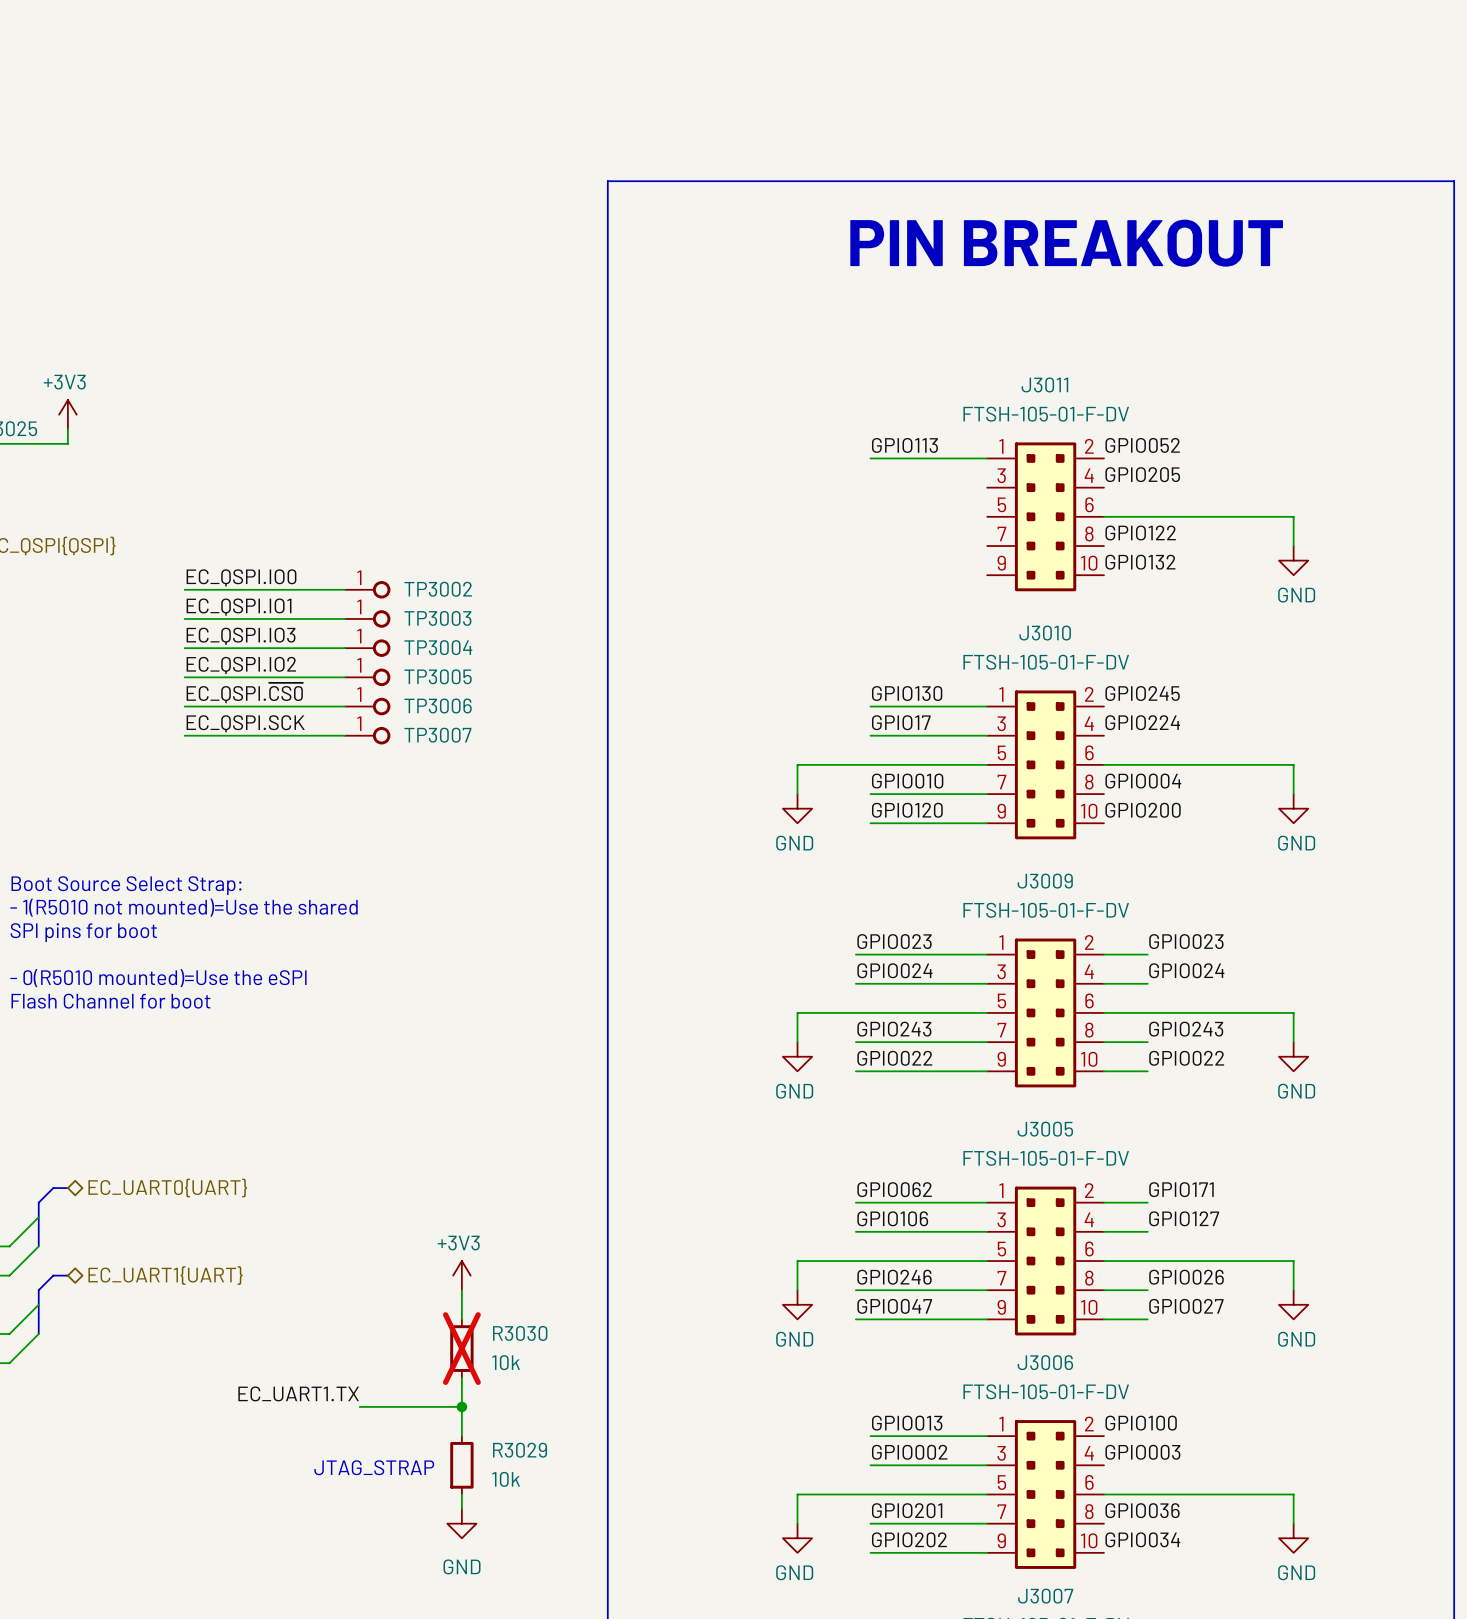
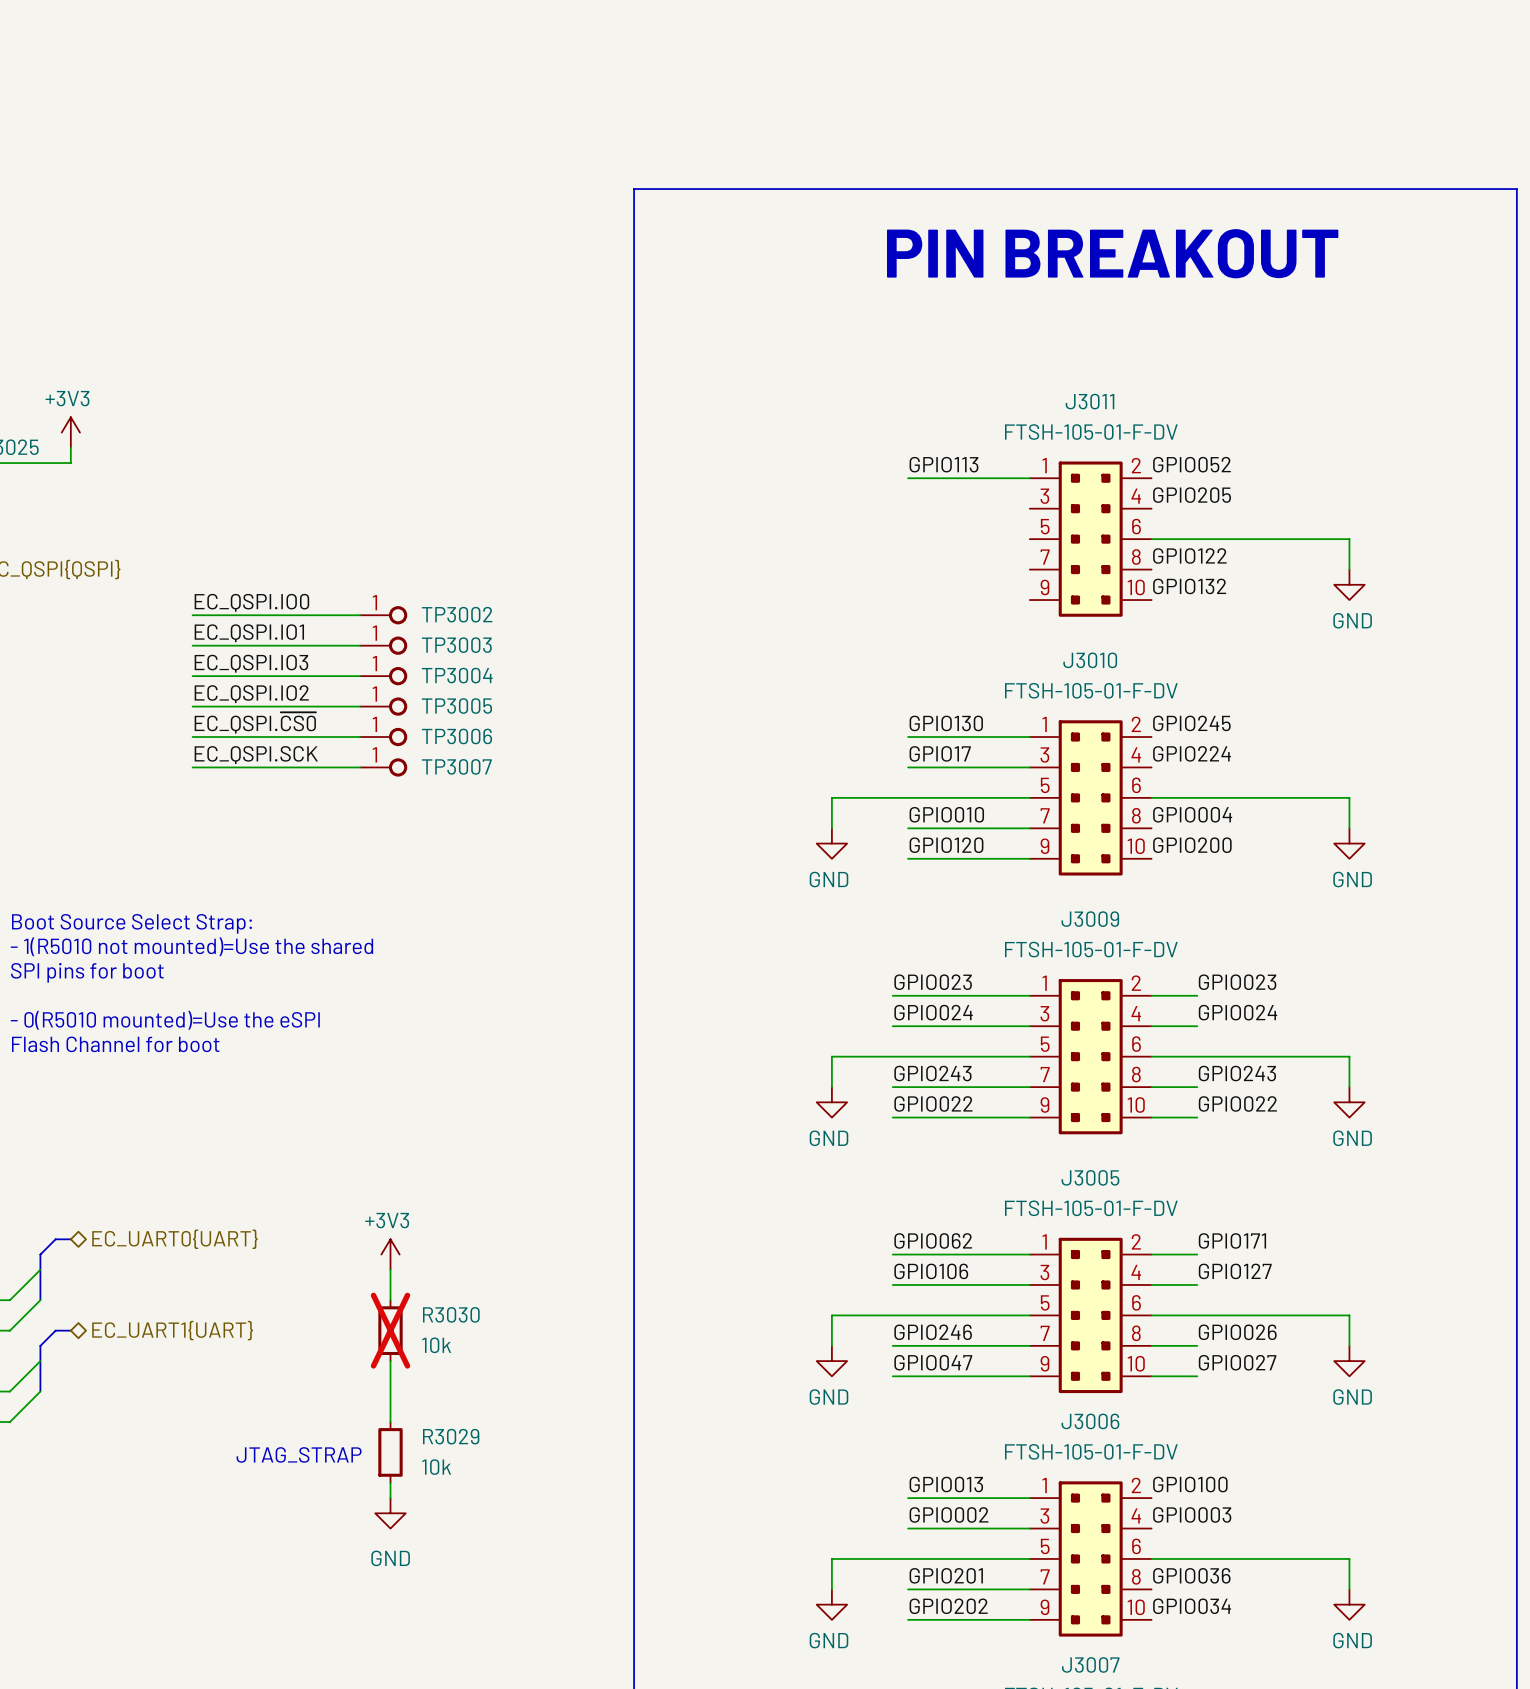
power symbol position: +3V3 (461, 1275) -> +3V3 (390, 1254)
wire: (461, 1290) (461, 1319) -> (390, 1269) (390, 1300)
R3030 position: (461, 1348) -> (390, 1330)
wire: (461, 1377) (461, 1436) -> (390, 1361) (390, 1421)
label: EC_UART1.TX (298, 1393) -> none
wire: (359, 1406) (461, 1406) -> none
junction: (461, 1406) -> none
R3029 position: (461, 1465) -> (390, 1452)
text position: JTAG_STRAP (374, 1467) -> JTAG_STRAP (299, 1454)
wire: (461, 1494) (461, 1509) -> (390, 1482) (390, 1498)
power symbol position: GND (461, 1523) -> GND (390, 1513)

